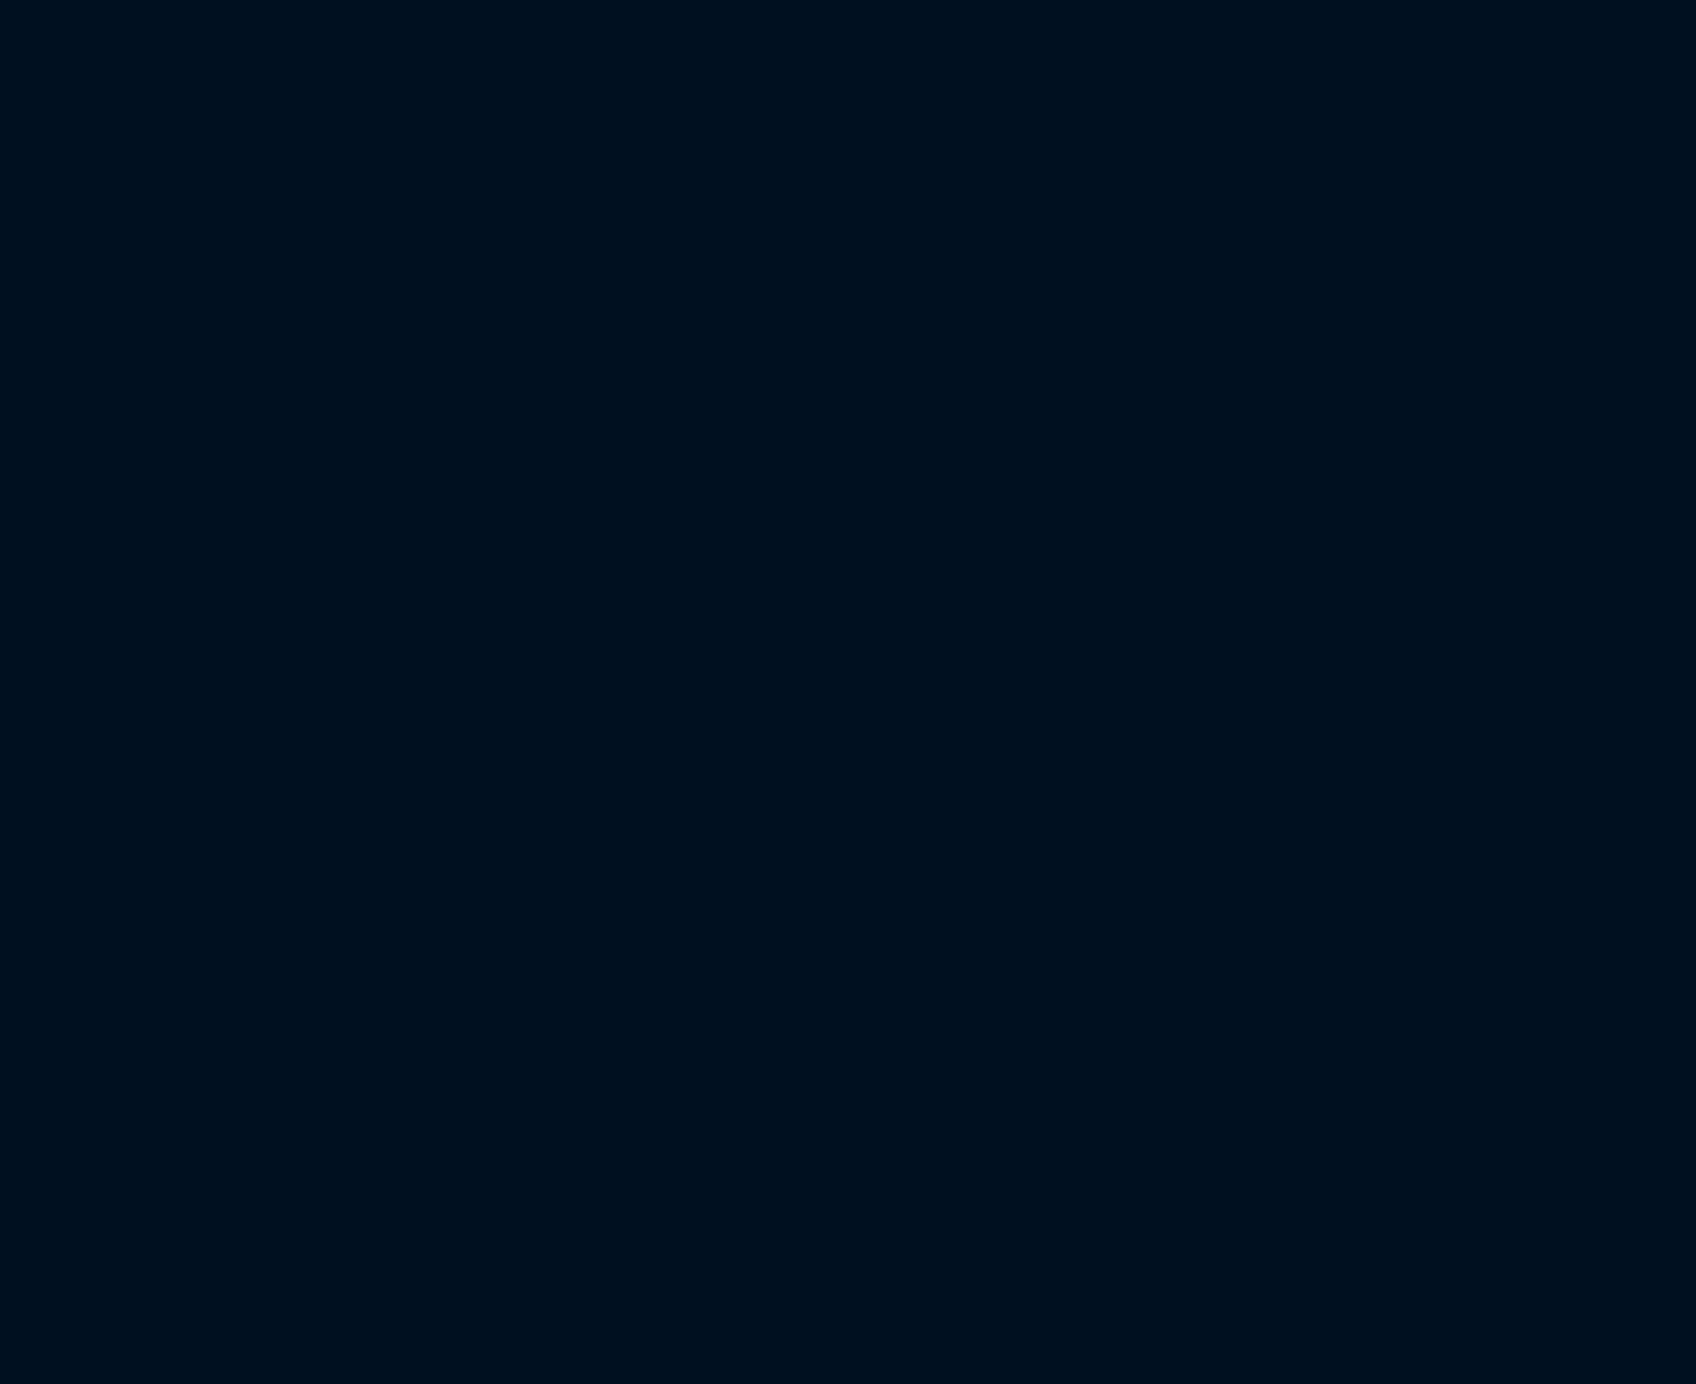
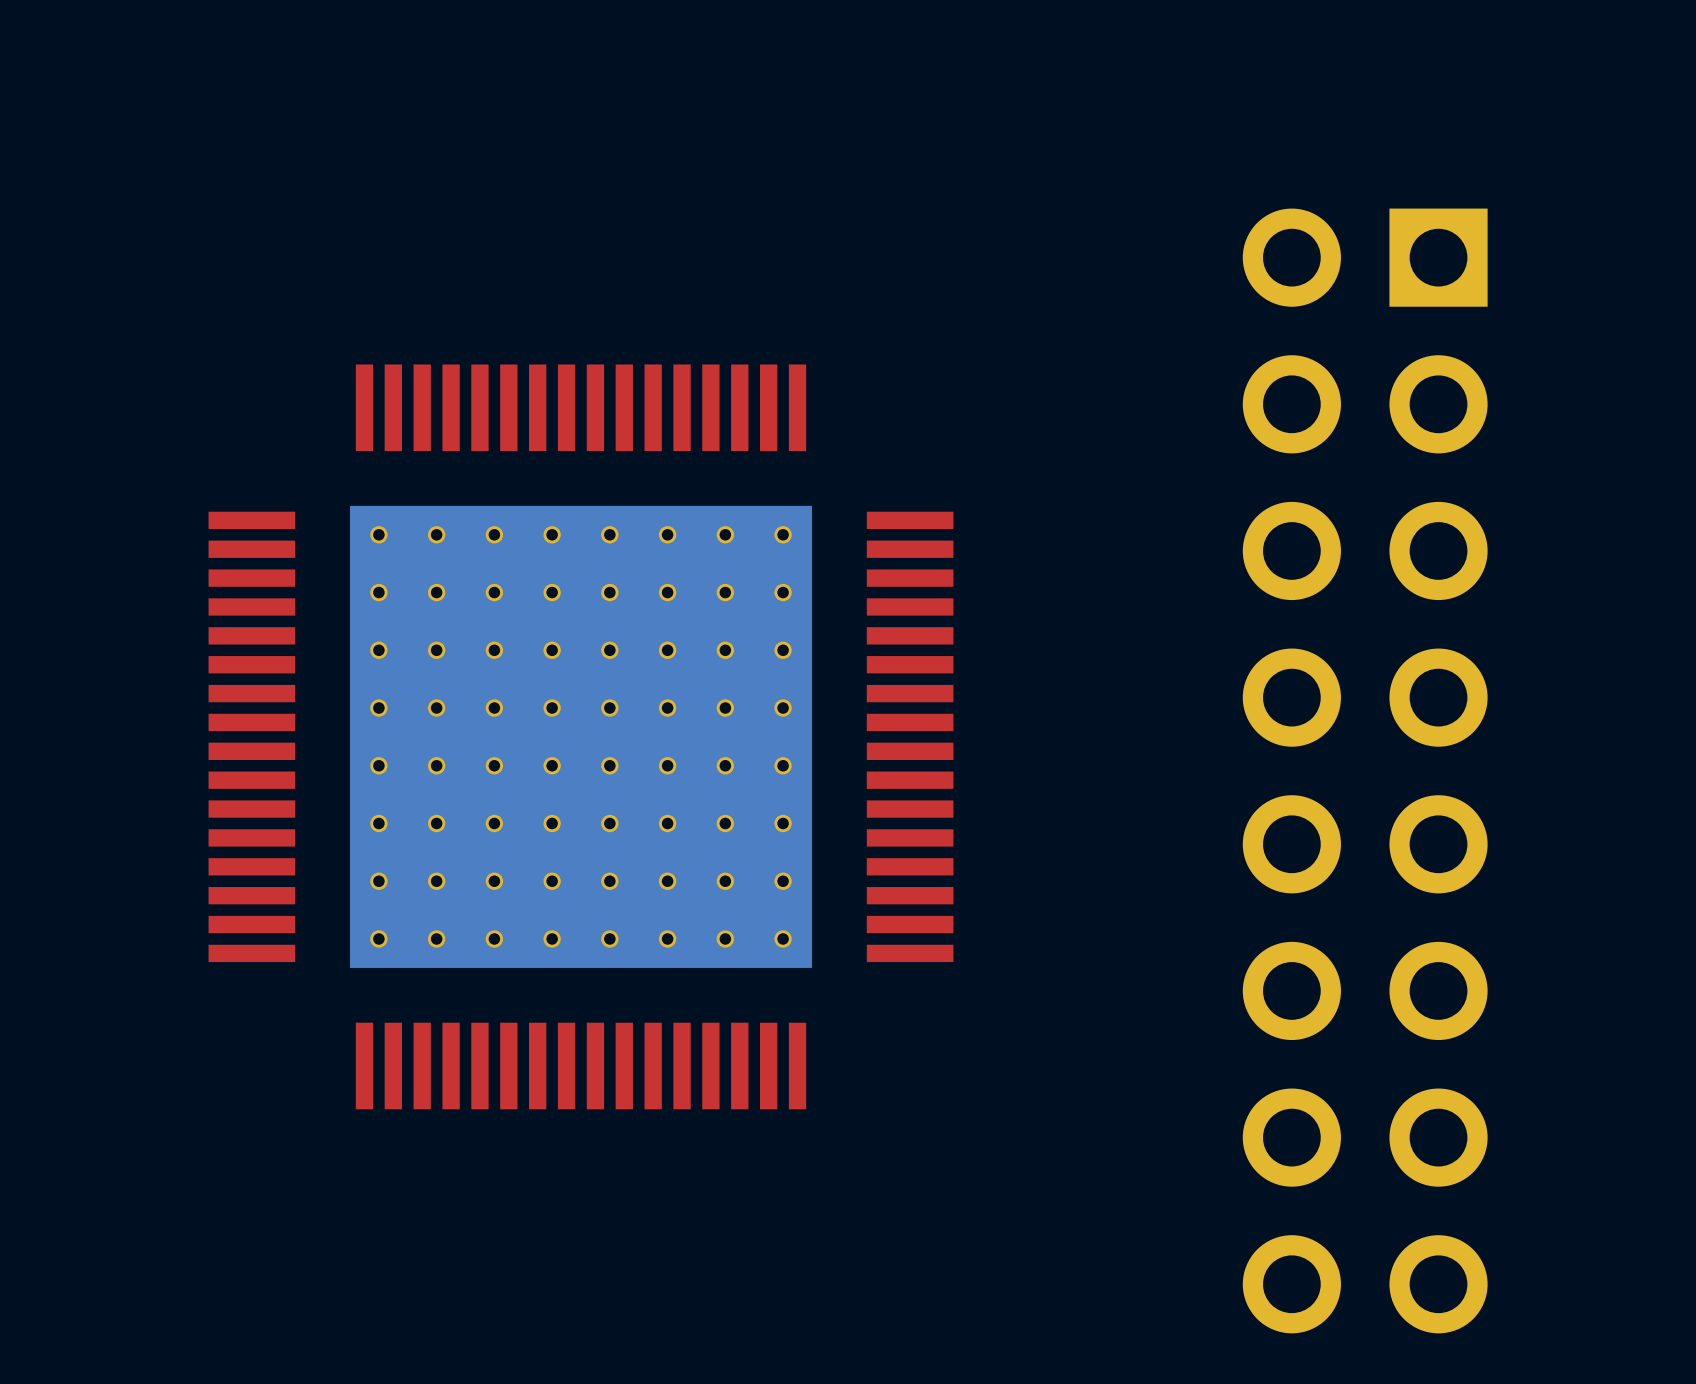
part: none -> (580, 736)
part: none -> (1365, 770)

